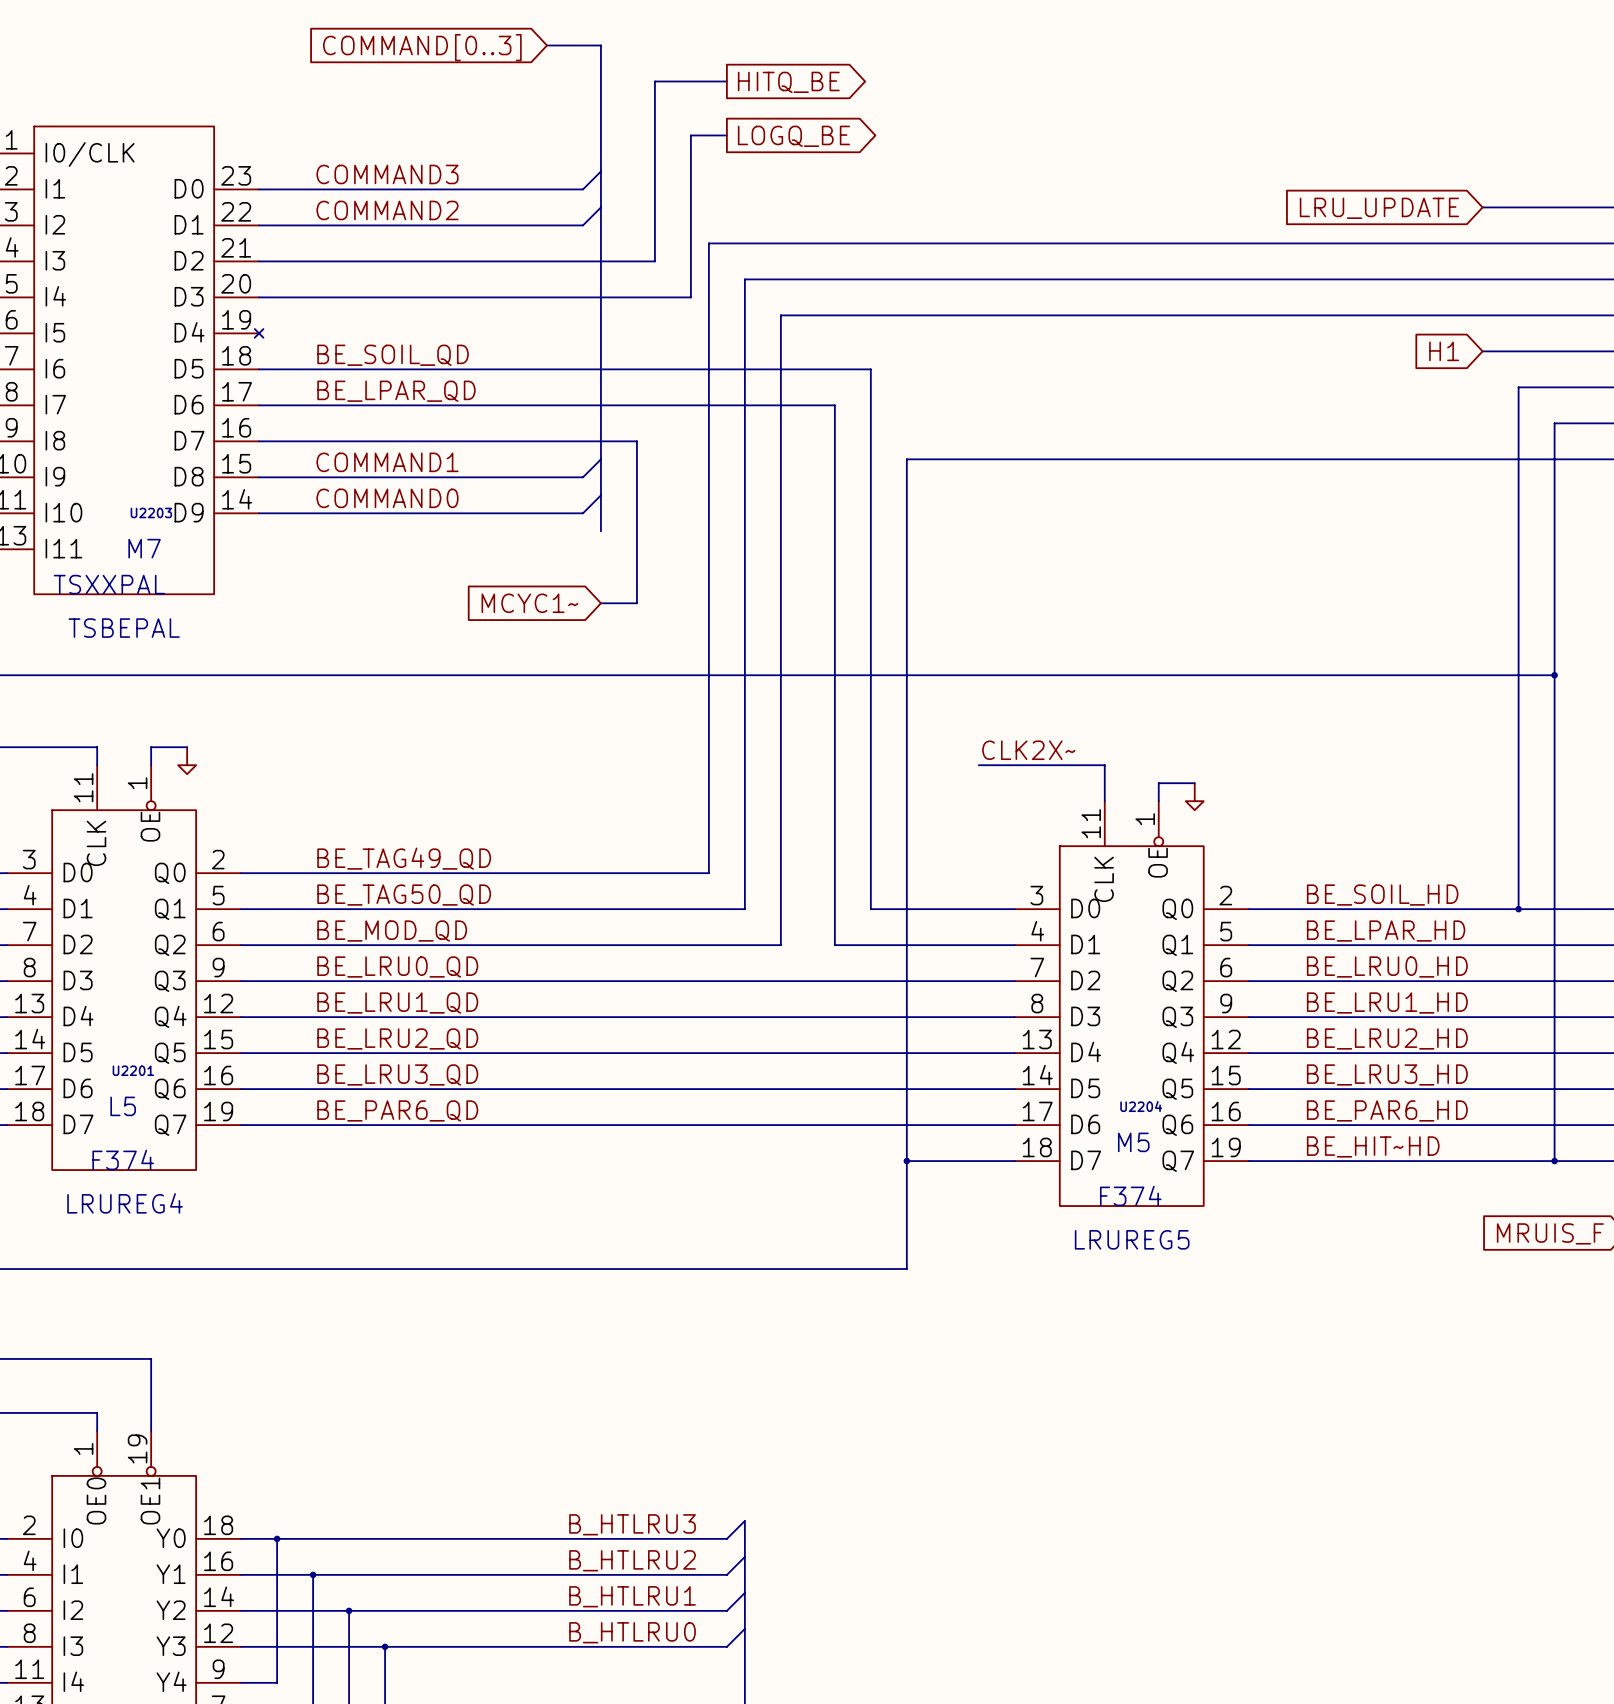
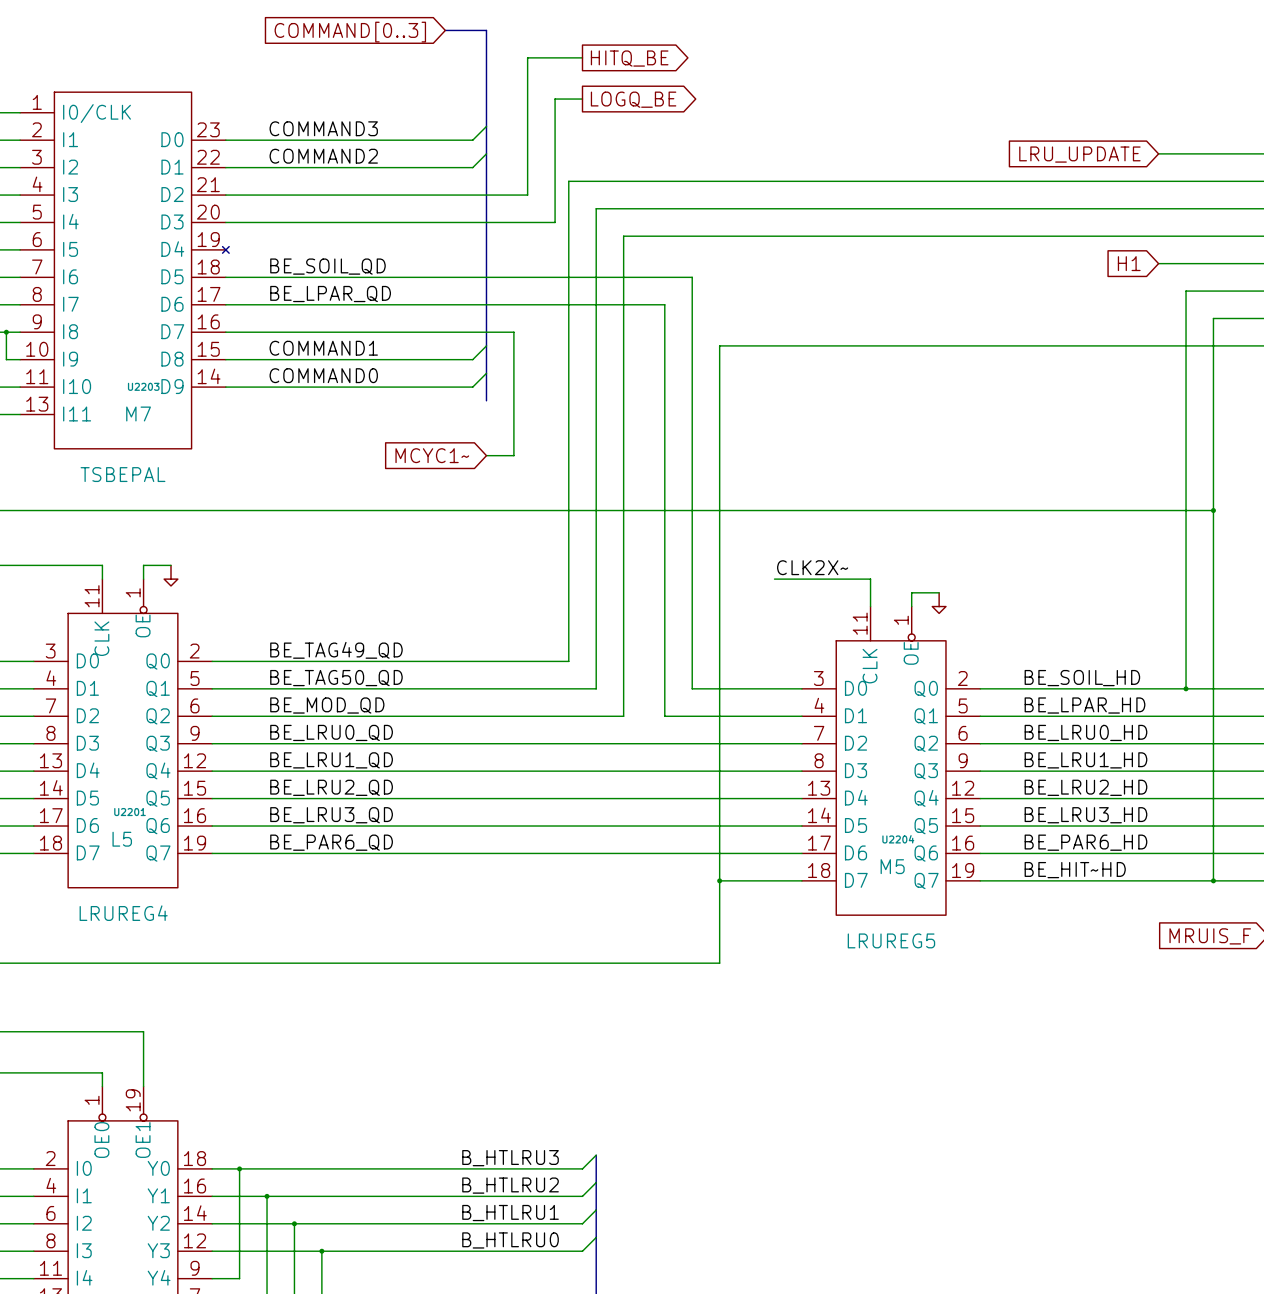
U2203 value: TSXXPAL (109, 584) -> none
U2201 value: F374 (123, 1159) -> none
U2204 value: F374 (1130, 1195) -> none

